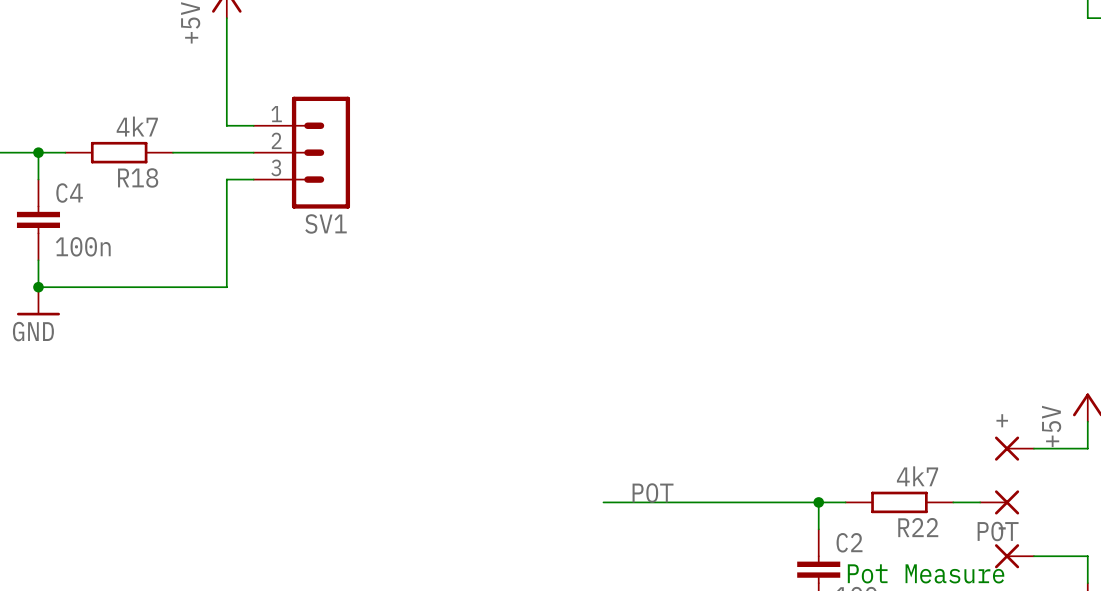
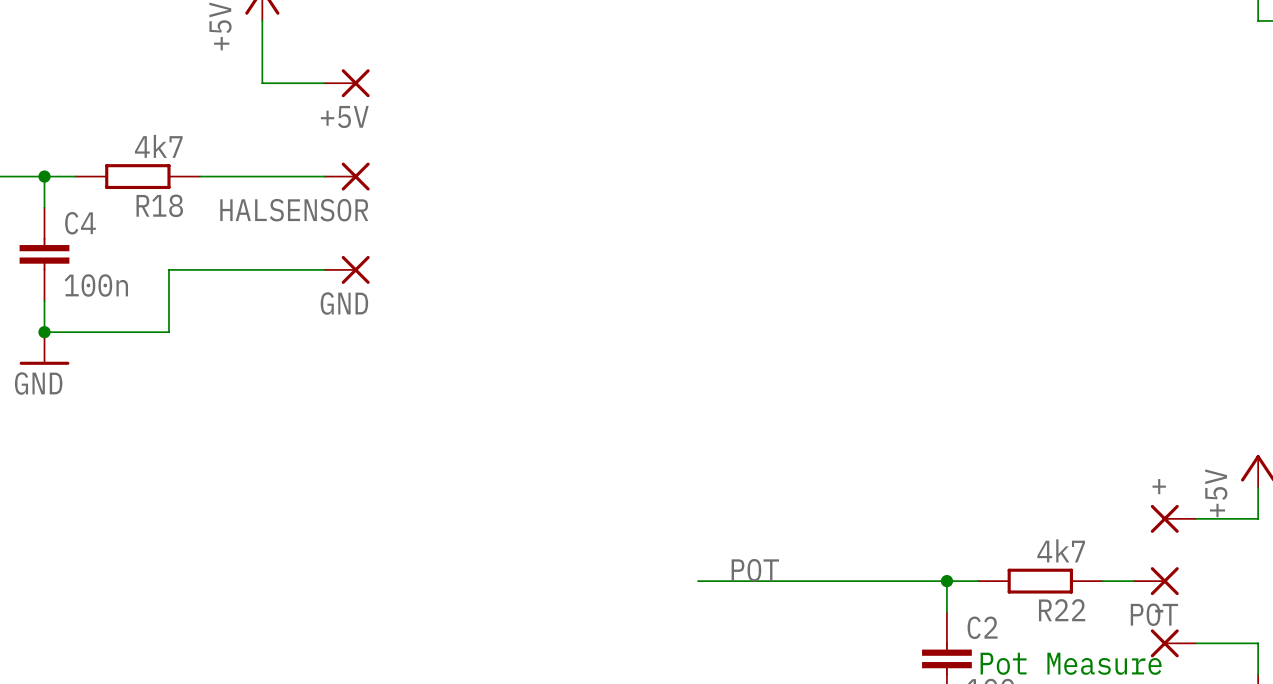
wire: (226, 71) (226, 125) (253, 125) -> (262, 83) (324, 83)
+5V: none -> (347, 83)
HALSENSOR: none -> (347, 176)
SV1: (301, 152) -> none
wire: (253, 179) (226, 179) (226, 287) (146, 287) -> (324, 269) (168, 269) (168, 332)
GND: none -> (347, 269)

